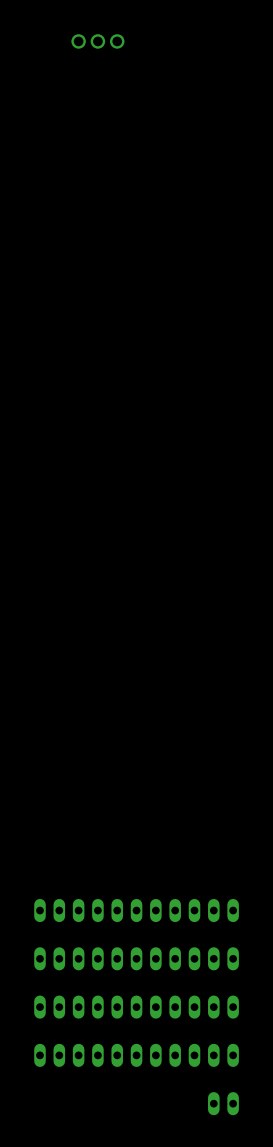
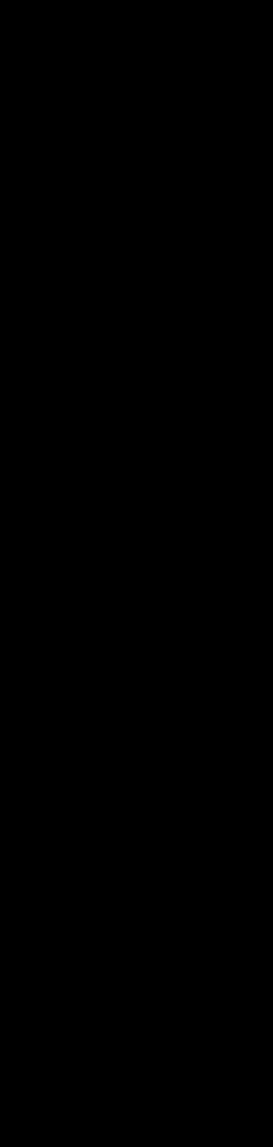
part: (97, 41) -> none
part: (136, 910) -> none
part: (136, 958) -> none
part: (136, 1007) -> none
part: (136, 1055) -> none
part: (223, 1103) -> none

